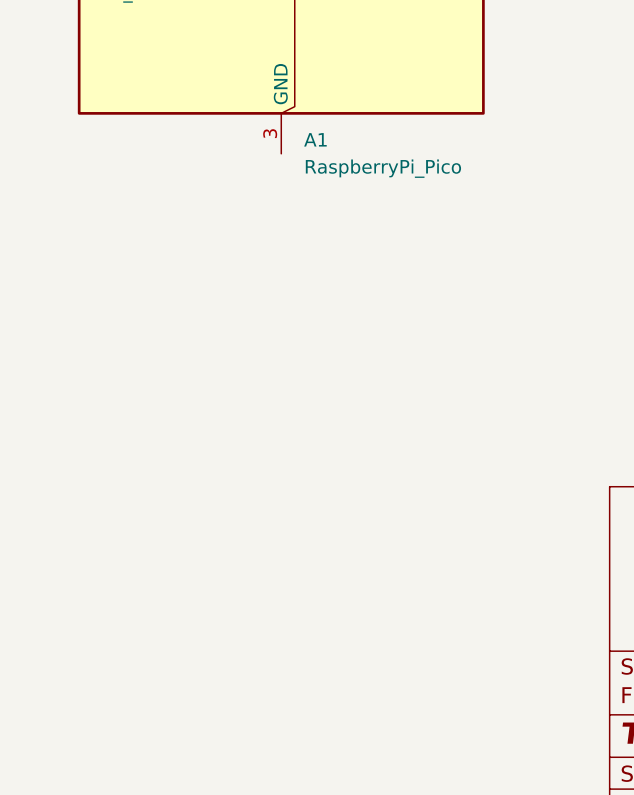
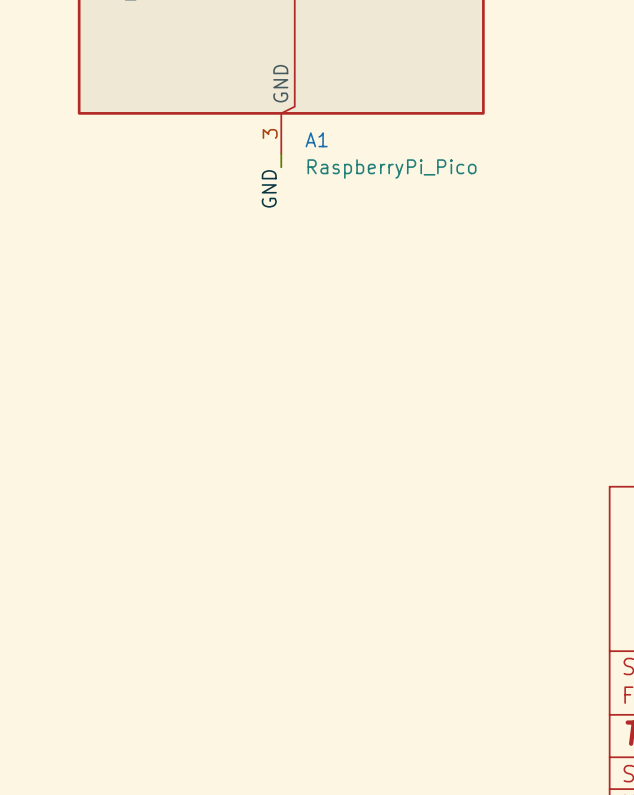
wire: none -> (281, 153) (281, 167)
label: none -> GND (269, 188)

